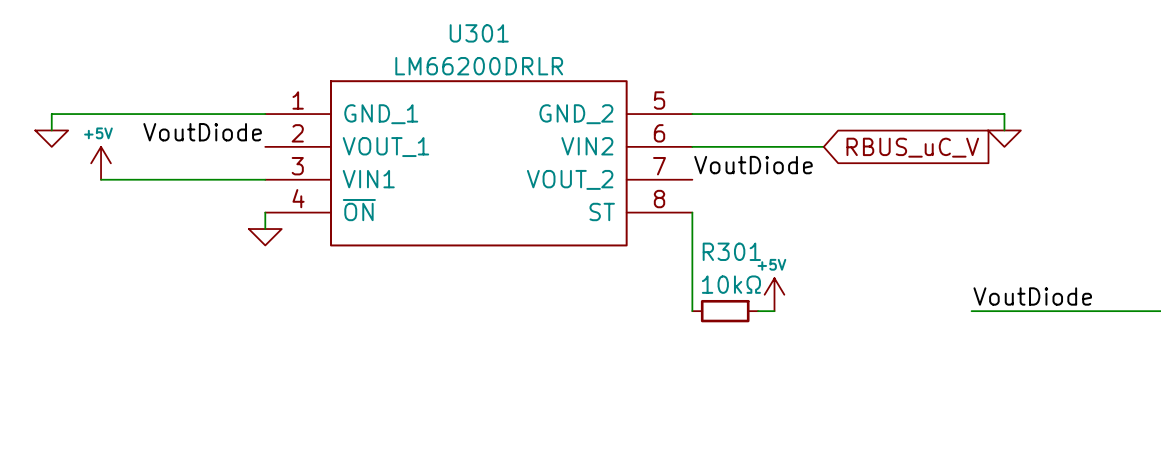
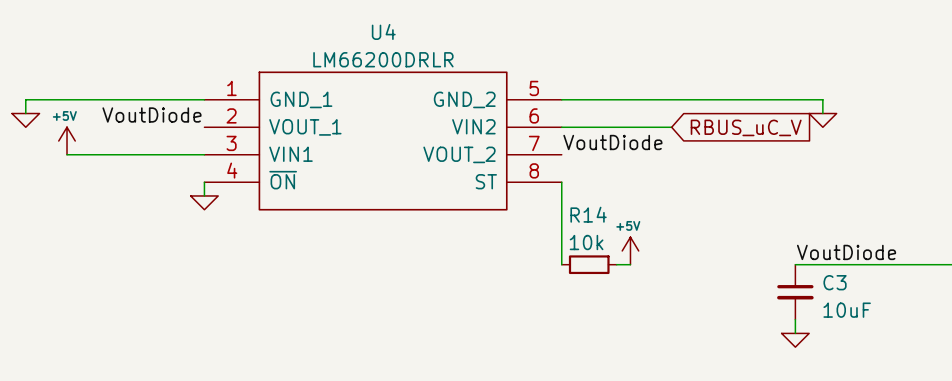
U301 name: U301 (479, 33) -> U4 (383, 31)
R301 name: R301 (731, 251) -> R14 (588, 214)
R301 value: 10kΩ (731, 284) -> 10k (586, 242)
C3: none -> 10uF (795, 292)
wire: none -> (795, 319) (795, 333)
power symbol: none -> (795, 340)

